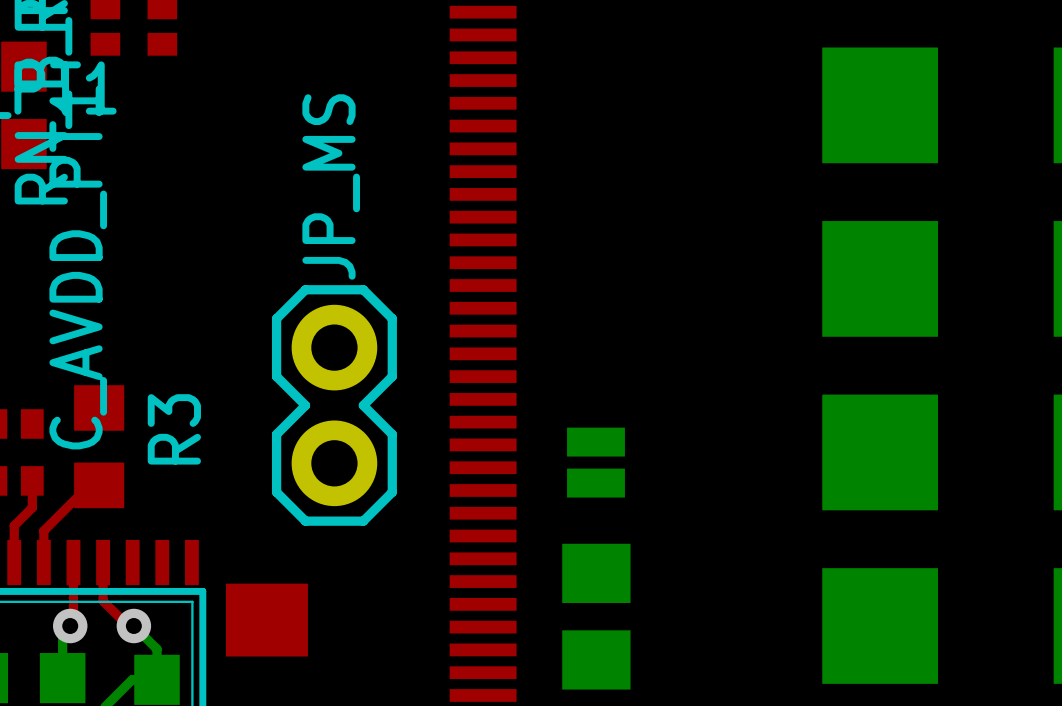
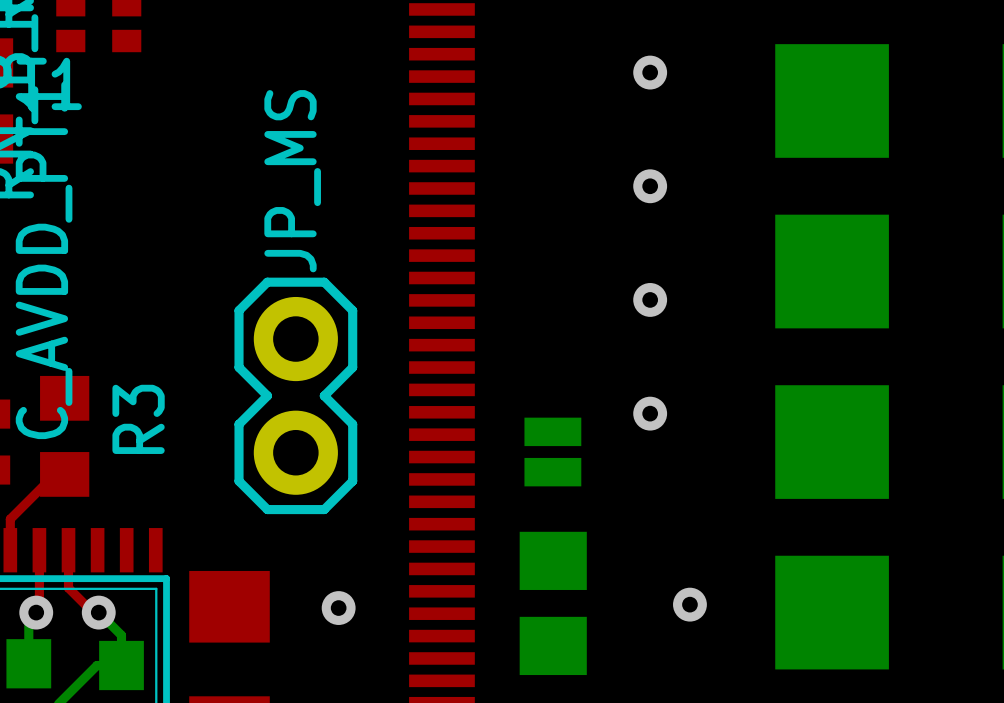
via: none -> (650, 72)
via: none -> (650, 186)
via: none -> (650, 299)
via: none -> (650, 413)
via: none -> (689, 604)
via: none -> (338, 608)

